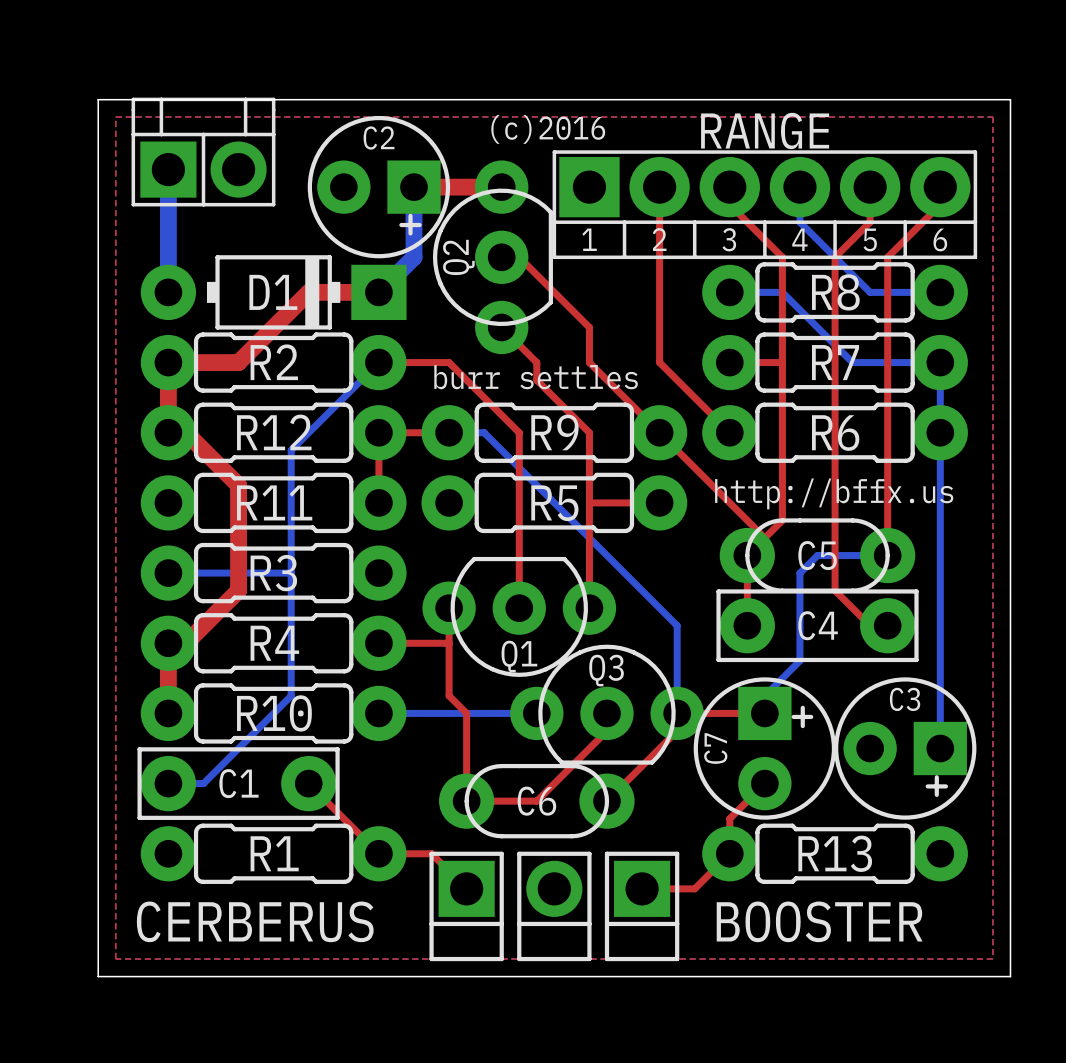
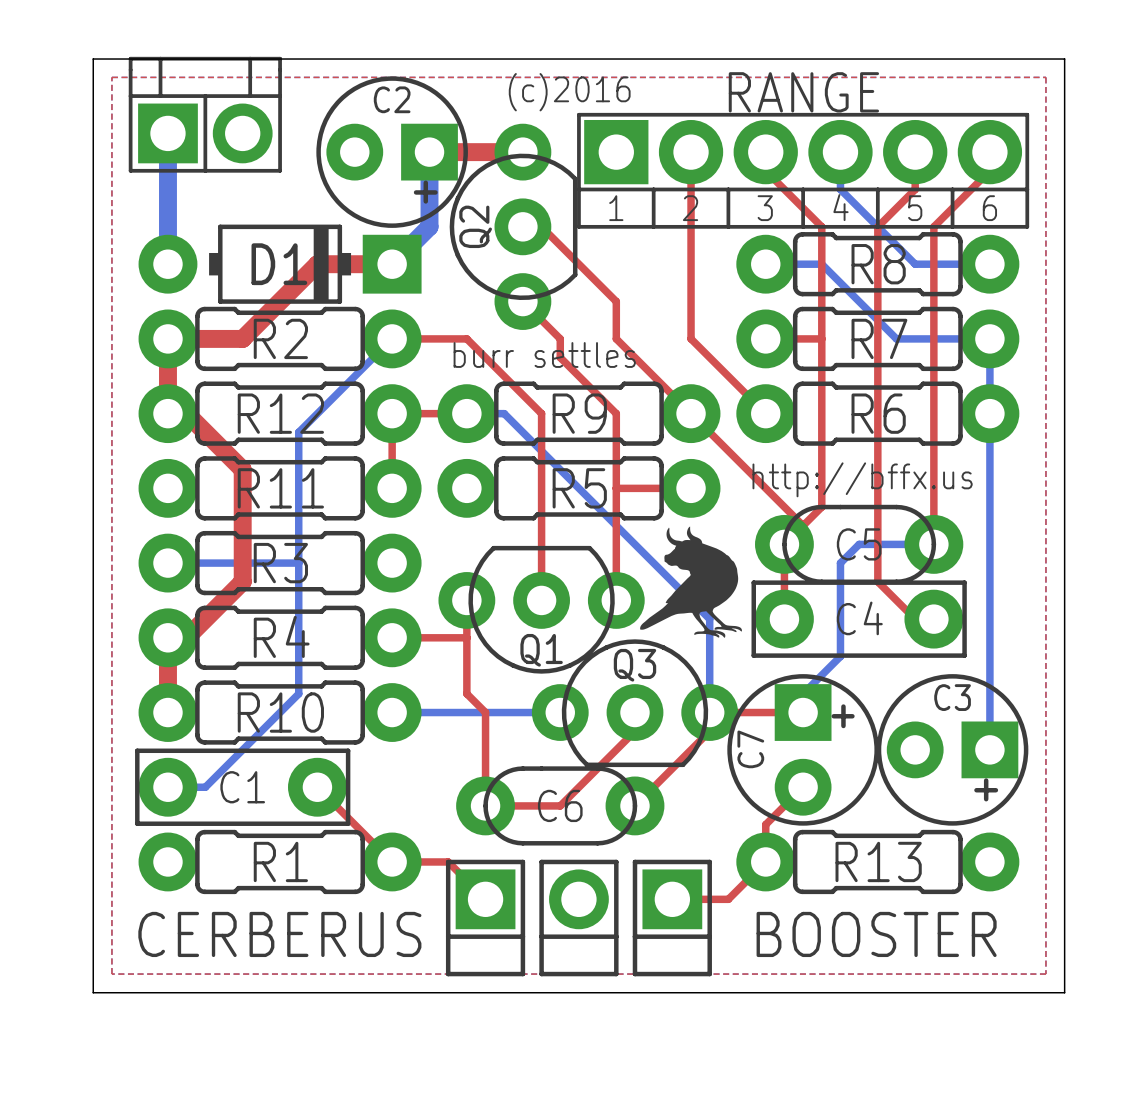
drawing: none -> [640, 525, 742, 638]

